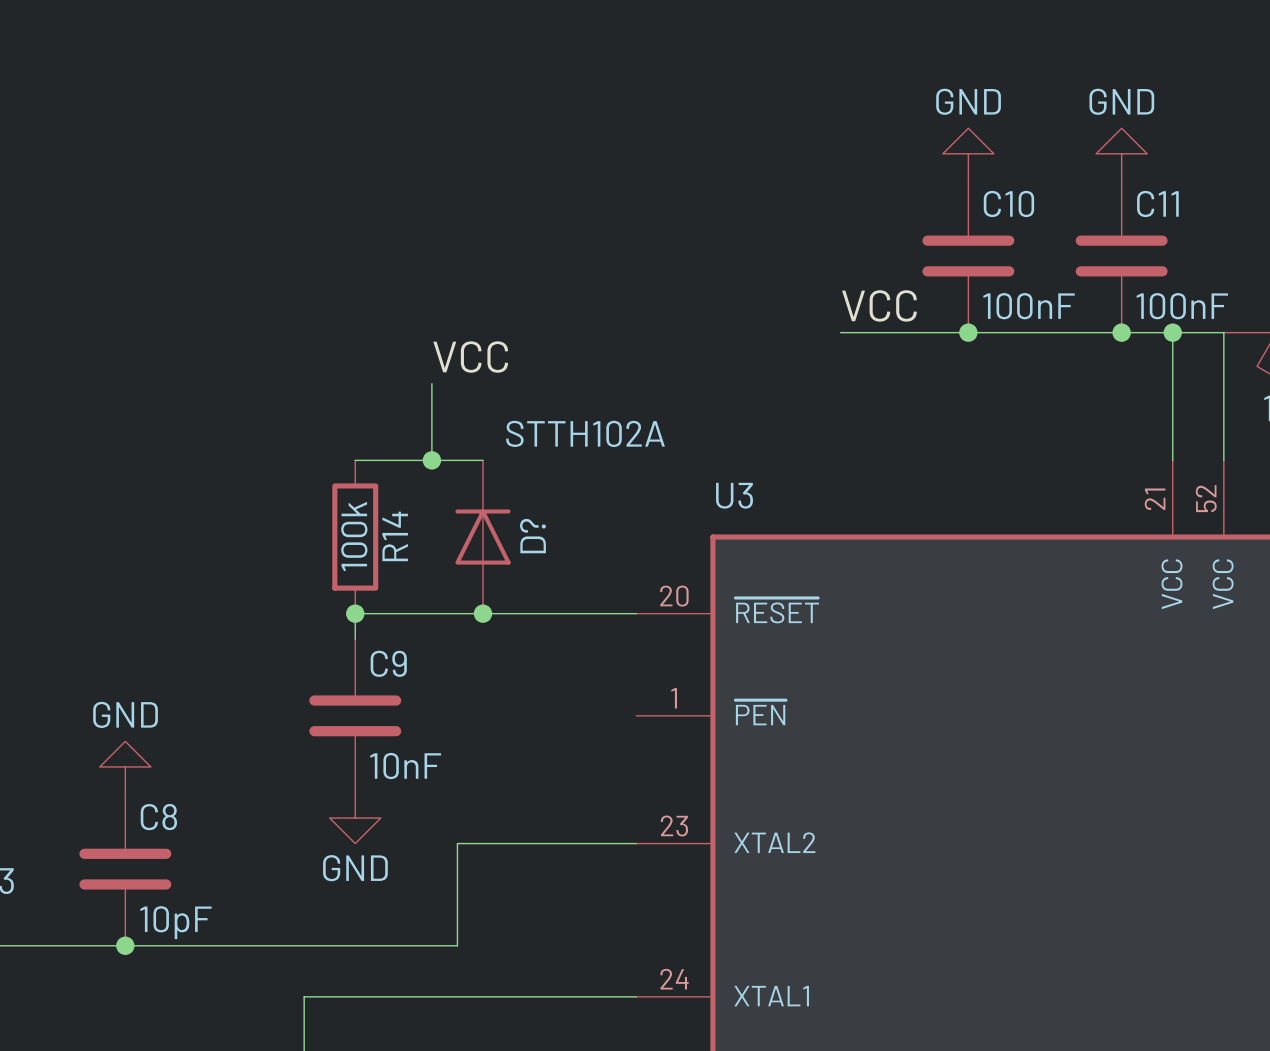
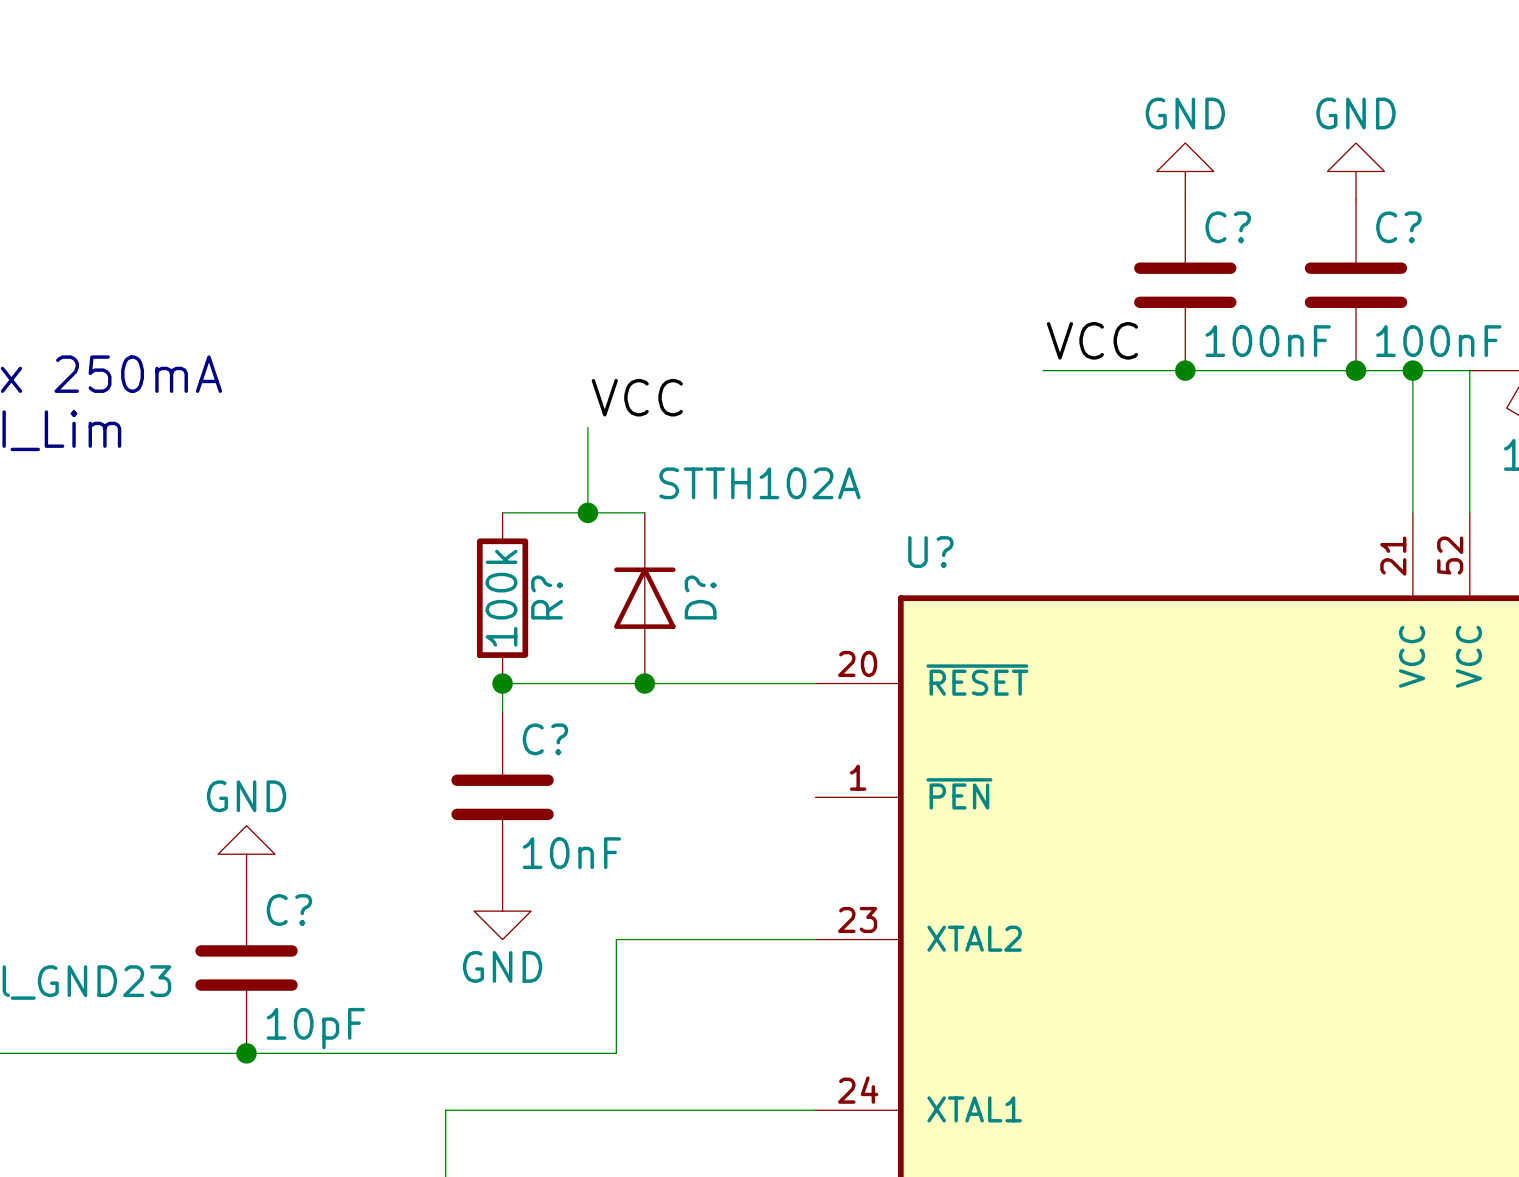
C10 name: C10 (1008, 203) -> C? (1228, 227)
C11 name: C11 (1157, 203) -> C? (1398, 227)
U3 name: U3 (734, 495) -> U? (930, 552)
R14 name: R14 (395, 536) -> R? (547, 597)
C9 name: C9 (388, 663) -> C? (545, 739)
C8 name: C8 (158, 817) -> C? (289, 910)

